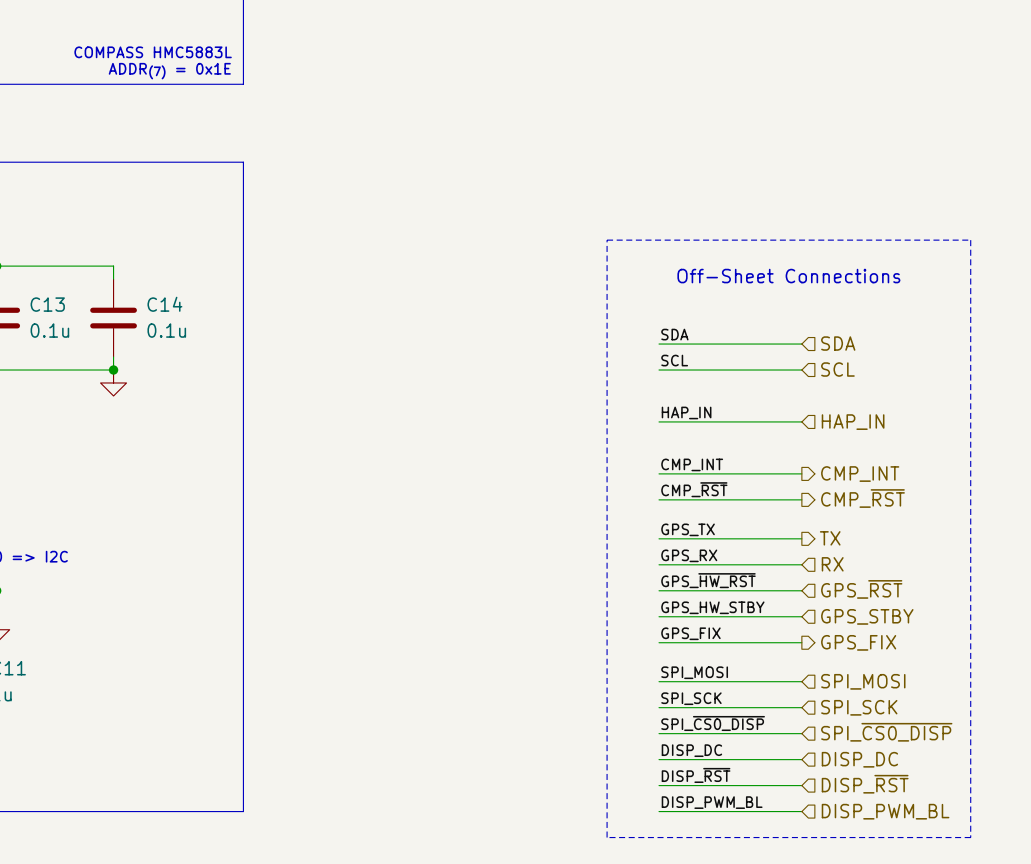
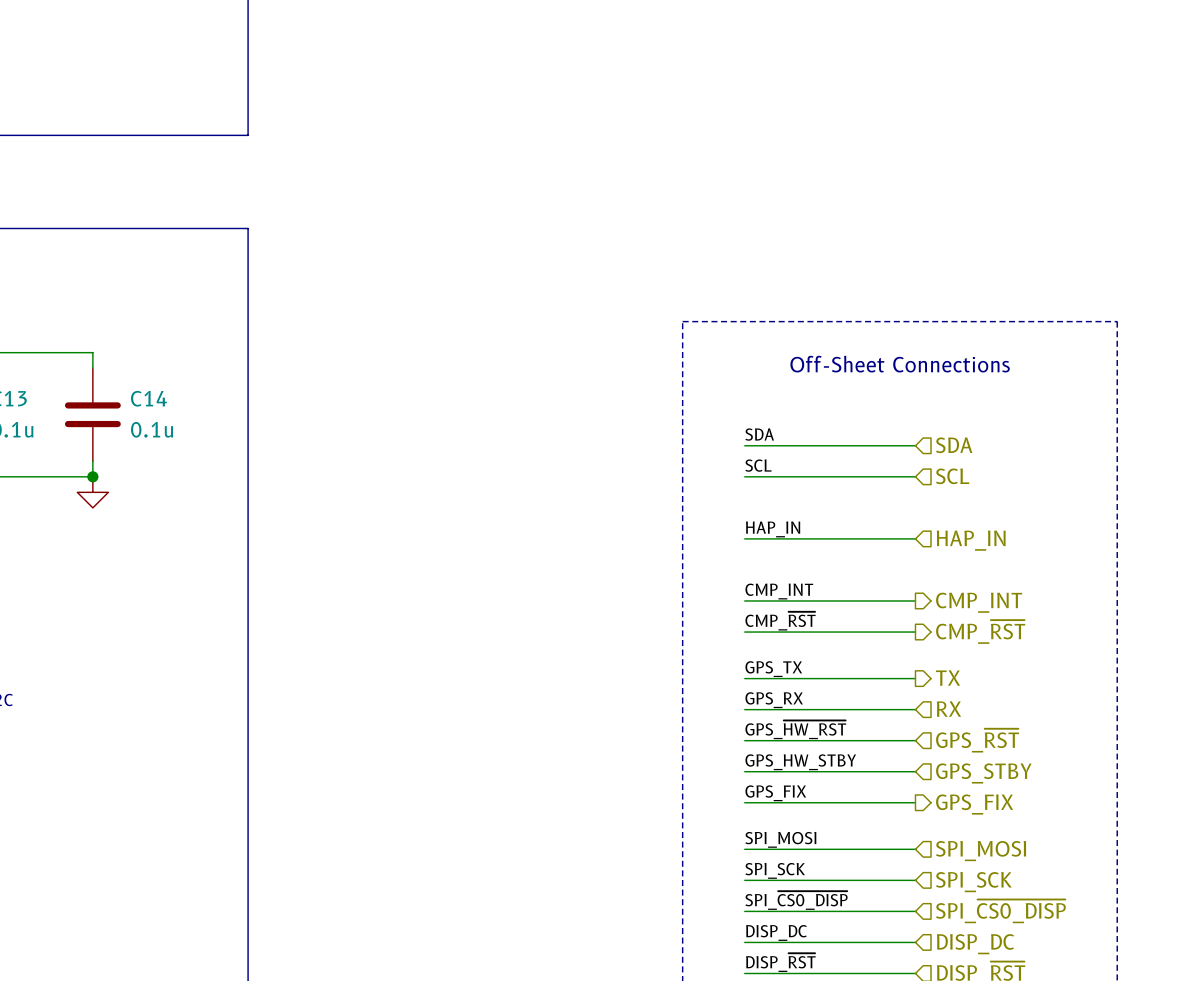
text: COMPASS HMC5883L (153, 52) -> none
text: ADDR(7) = 0x1E (169, 71) -> none

